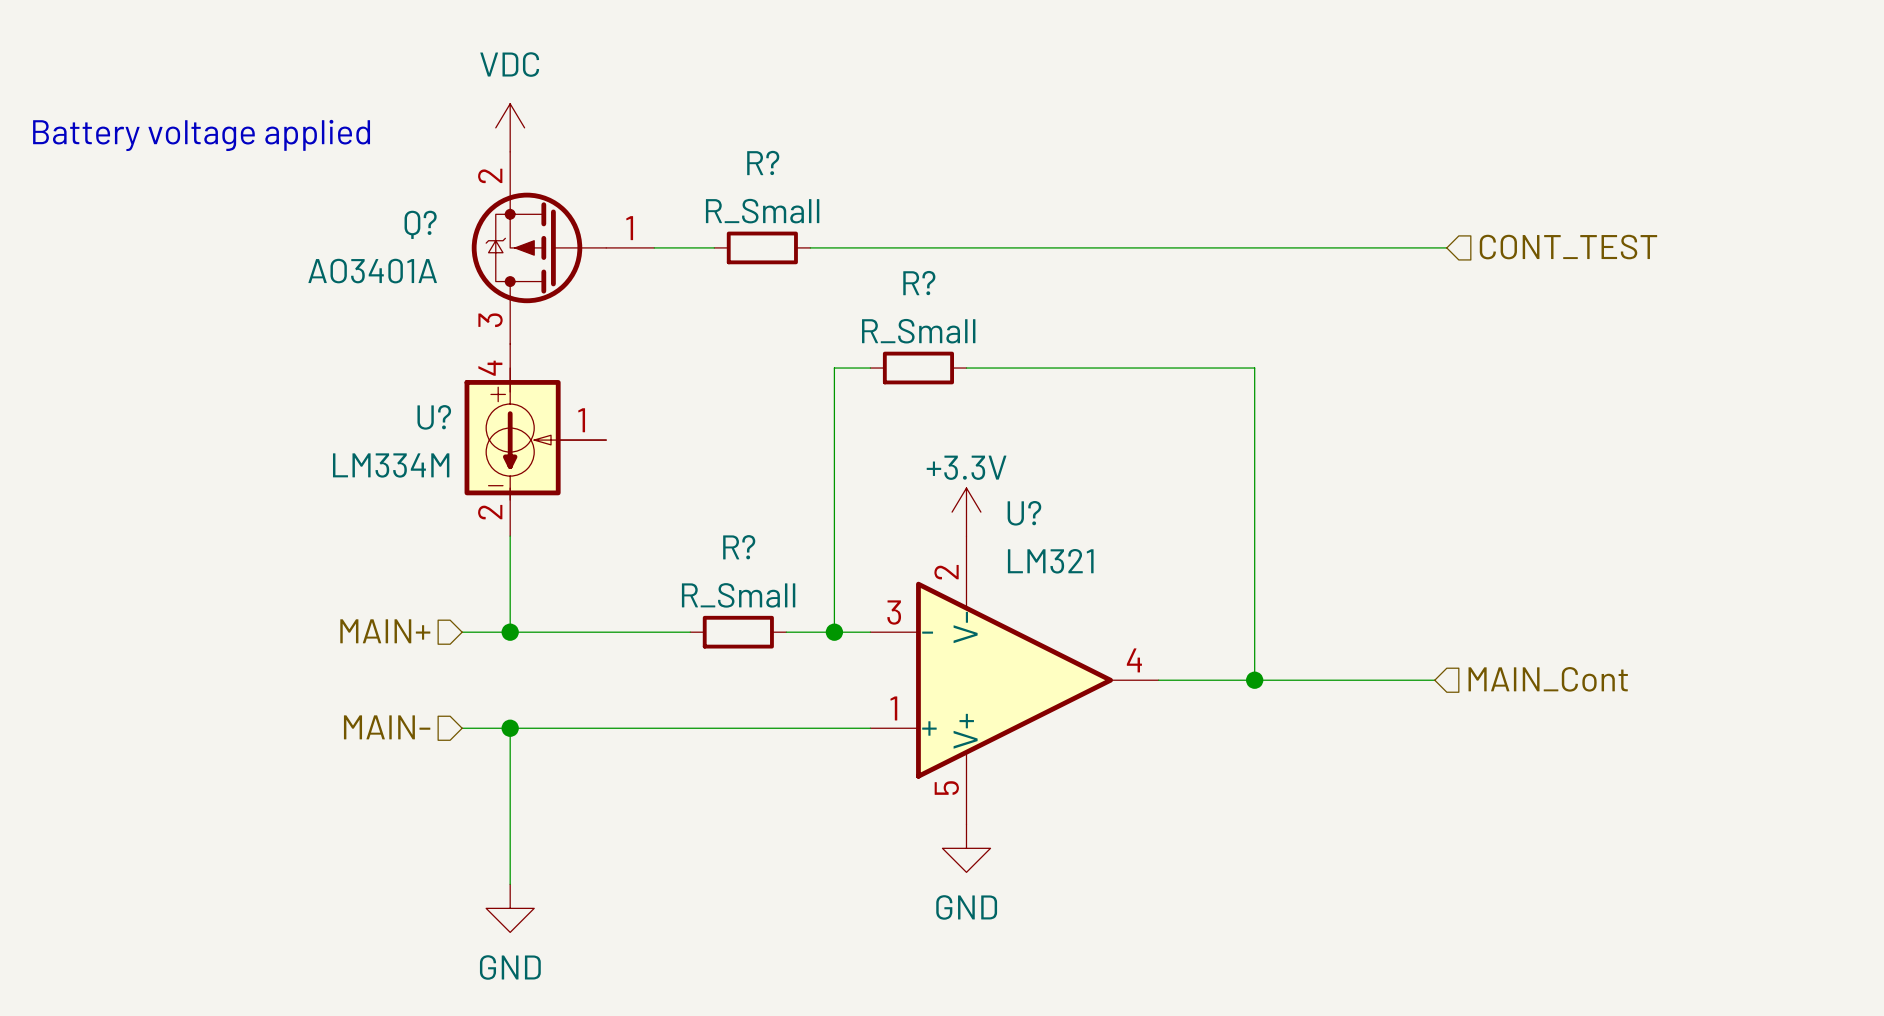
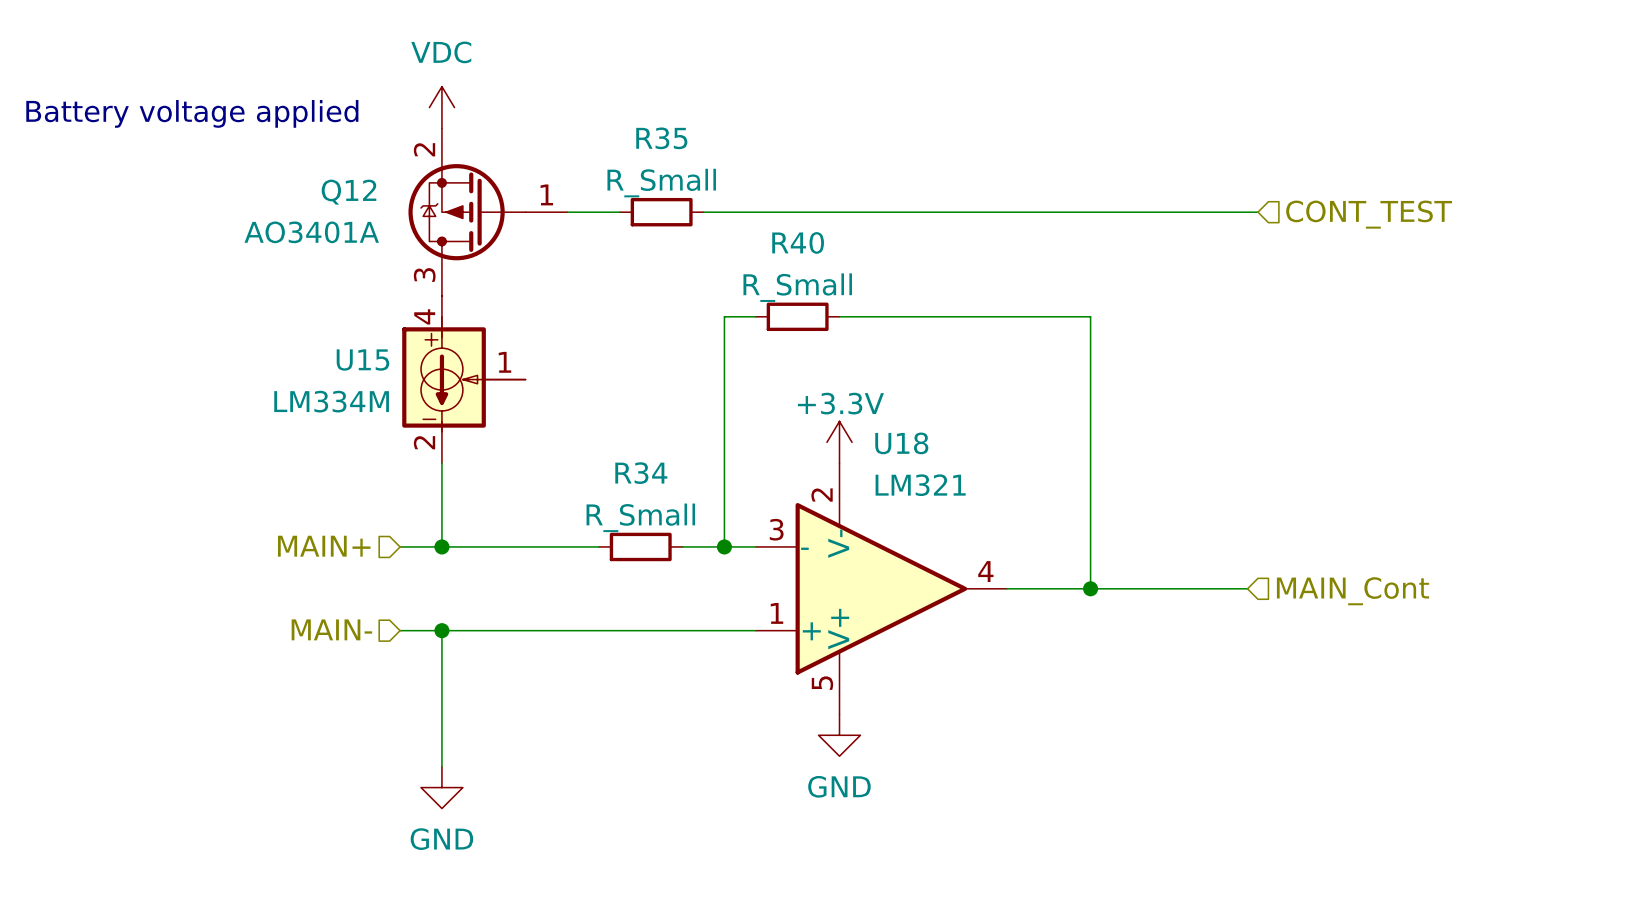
R? name: R? (763, 162) -> R35 (661, 138)
Q? name: Q? (420, 224) -> Q12 (348, 192)
R? name: R? (919, 283) -> R40 (798, 242)
U? name: U? (434, 417) -> U15 (362, 360)
U? name: U? (1024, 513) -> U18 (901, 443)
R? name: R? (739, 547) -> R34 (641, 473)

